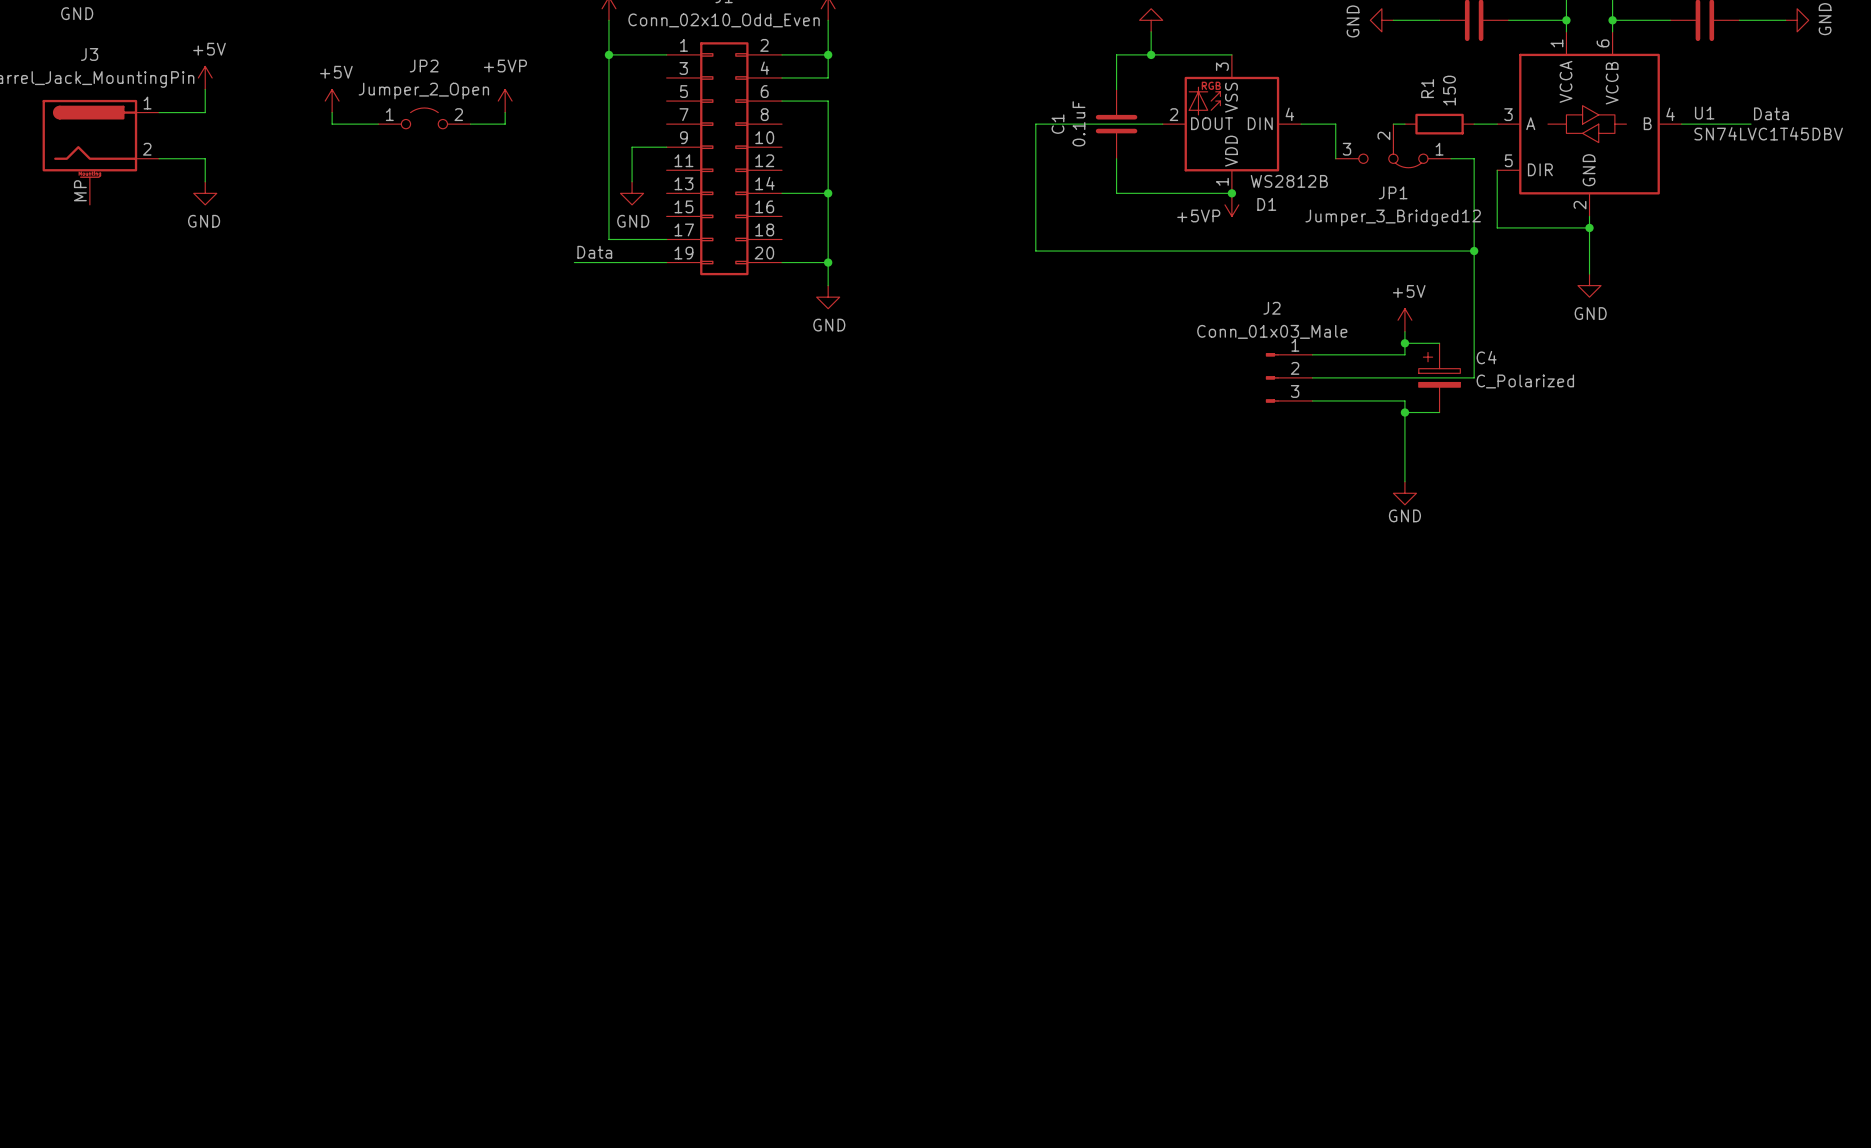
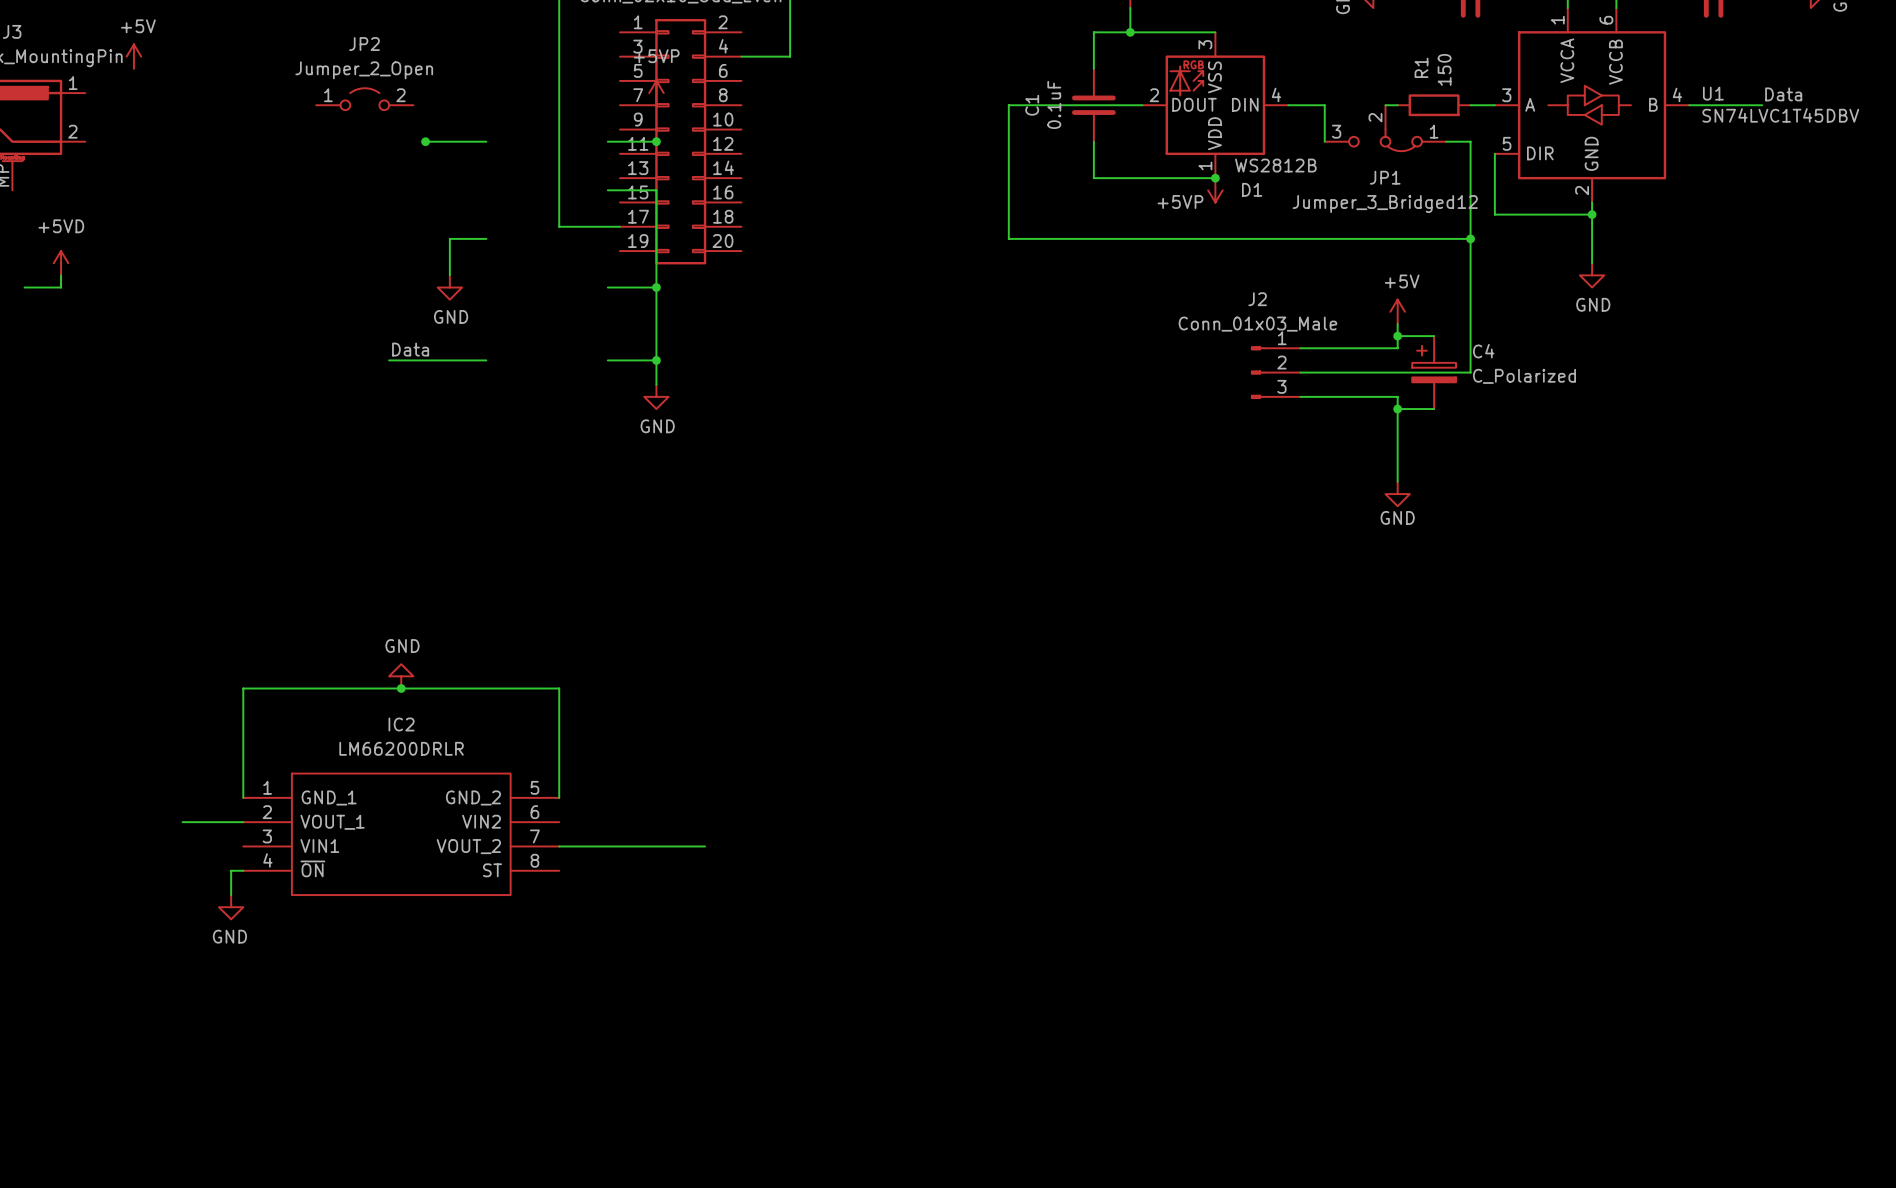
wire: (608, 54) (666, 54) -> (425, 141) (486, 141)
junction: (608, 54) -> none
wire: (782, 54) (828, 54) -> (607, 141) (656, 141)
junction: (828, 54) -> none
wire: (205, 89) (205, 112) (159, 112) -> none
power symbol: +5V (332, 101) -> none
power symbol position: +5VP (505, 101) -> +5VP (656, 93)
wire: (782, 101) (828, 101) (828, 285) -> (607, 190) (656, 190) (656, 384)
wire: (332, 112) (332, 124) (378, 124) -> none
wire: (505, 112) (505, 124) (470, 124) -> none
wire: (666, 147) (632, 147) (632, 181) -> (486, 238) (449, 238) (449, 275)
wire: (159, 158) (205, 158) (205, 181) -> none
junction: none -> (425, 141)
junction: none -> (656, 141)
power symbol: GND (205, 193) -> none
power symbol: GND (632, 193) -> none
wire: (782, 193) (828, 193) -> (607, 287) (656, 287)
junction: (828, 193) -> none
label position: Data (594, 252) -> Data (410, 349)
wire: (574, 262) (666, 262) -> (389, 360) (486, 360)
wire: (782, 262) (828, 262) -> (607, 360) (656, 360)
junction: (828, 262) -> none
power symbol: none -> +5VD (61, 263)
wire: none -> (61, 275) (61, 287) (24, 287)
power symbol: none -> GND (449, 287)
junction: none -> (656, 287)
power symbol: GND (828, 297) -> none
junction: none -> (656, 360)
power symbol: none -> GND (656, 396)
power symbol: none -> GND (401, 676)
junction: none -> (401, 688)
wire: none -> (243, 797) (243, 688) (559, 688) (559, 797)
wire: none -> (182, 822) (243, 822)
IC2: none -> LM66200DRLR (401, 834)
wire: none -> (559, 846) (705, 846)
wire: none -> (243, 870) (231, 870) (231, 895)
power symbol: none -> GND (231, 907)

